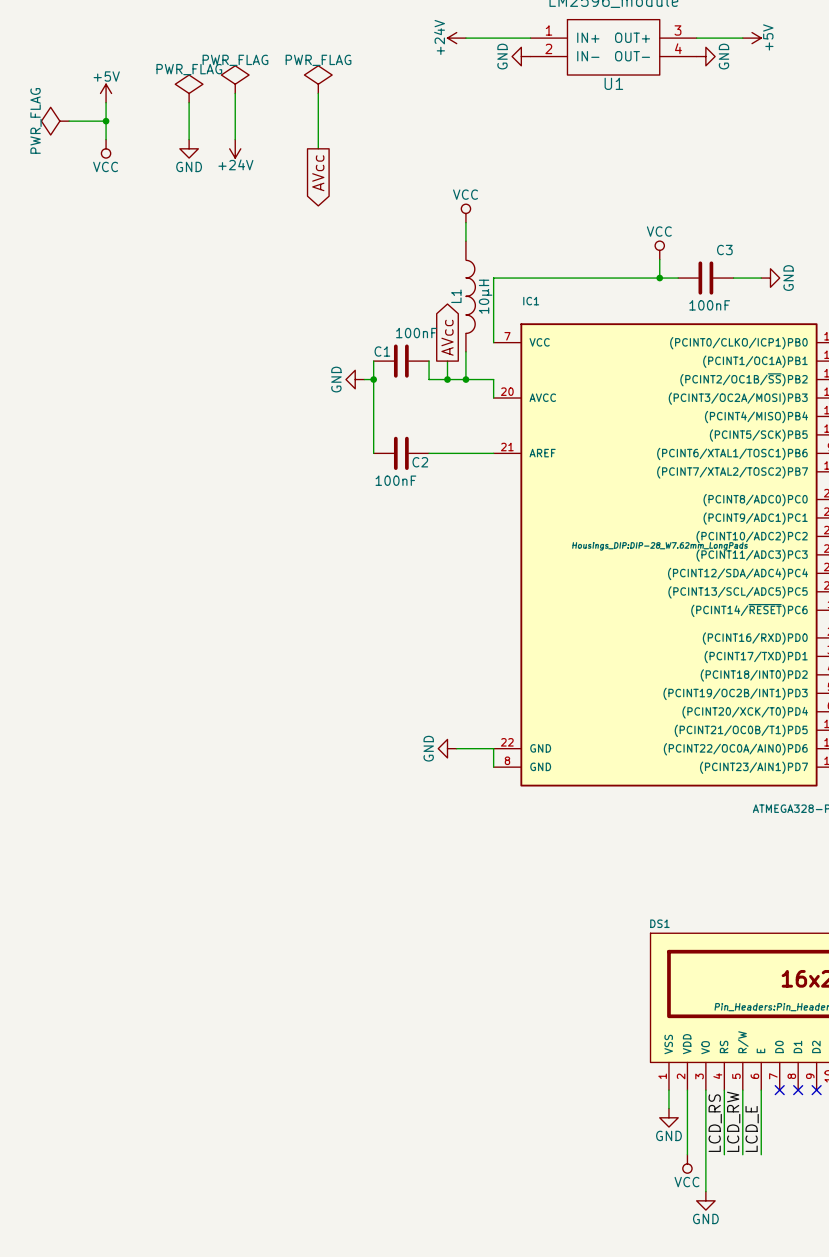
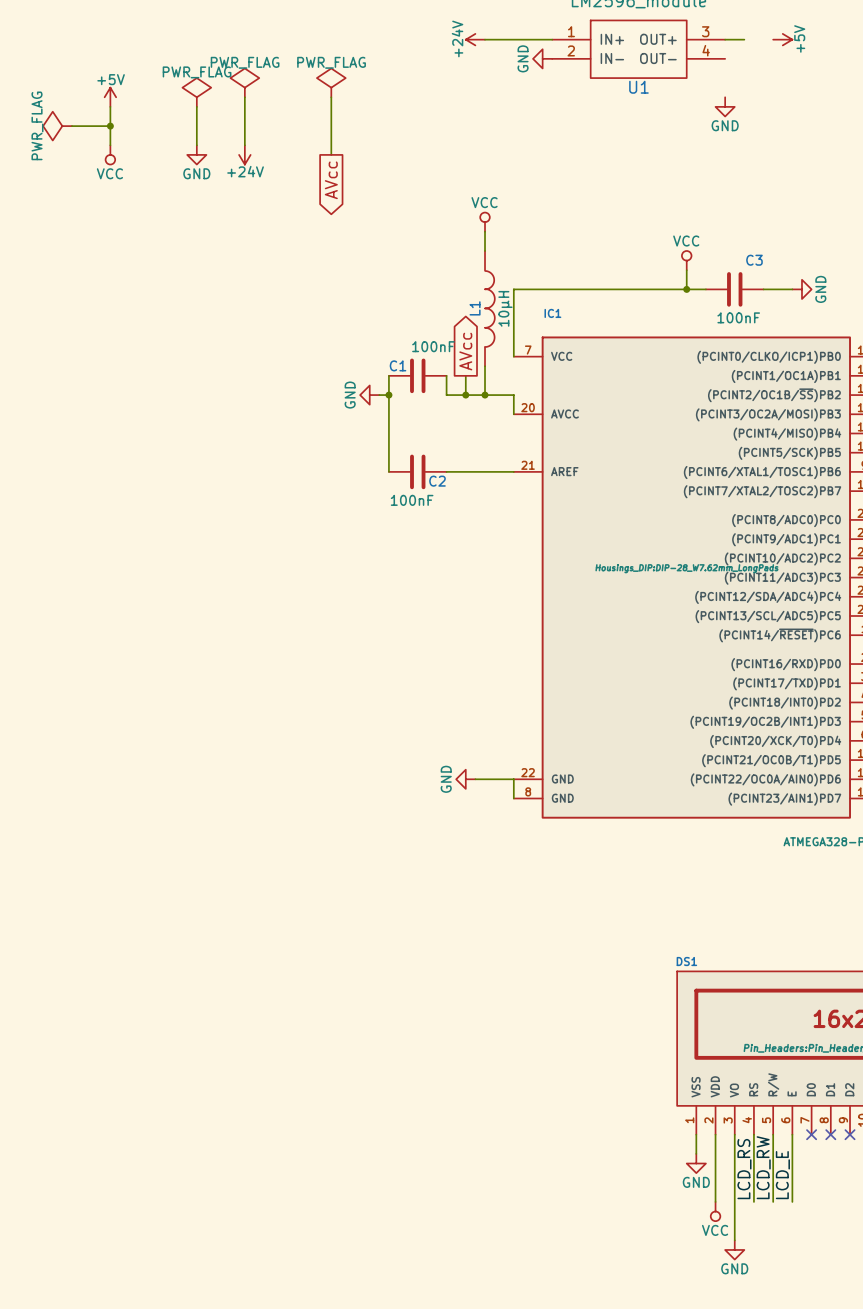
wire: (715, 38) (742, 38) -> none
power symbol rotation: 0° (705, 56) -> 90° clockwise (725, 106)
power symbol position: GND (705, 56) -> GND (725, 106)

